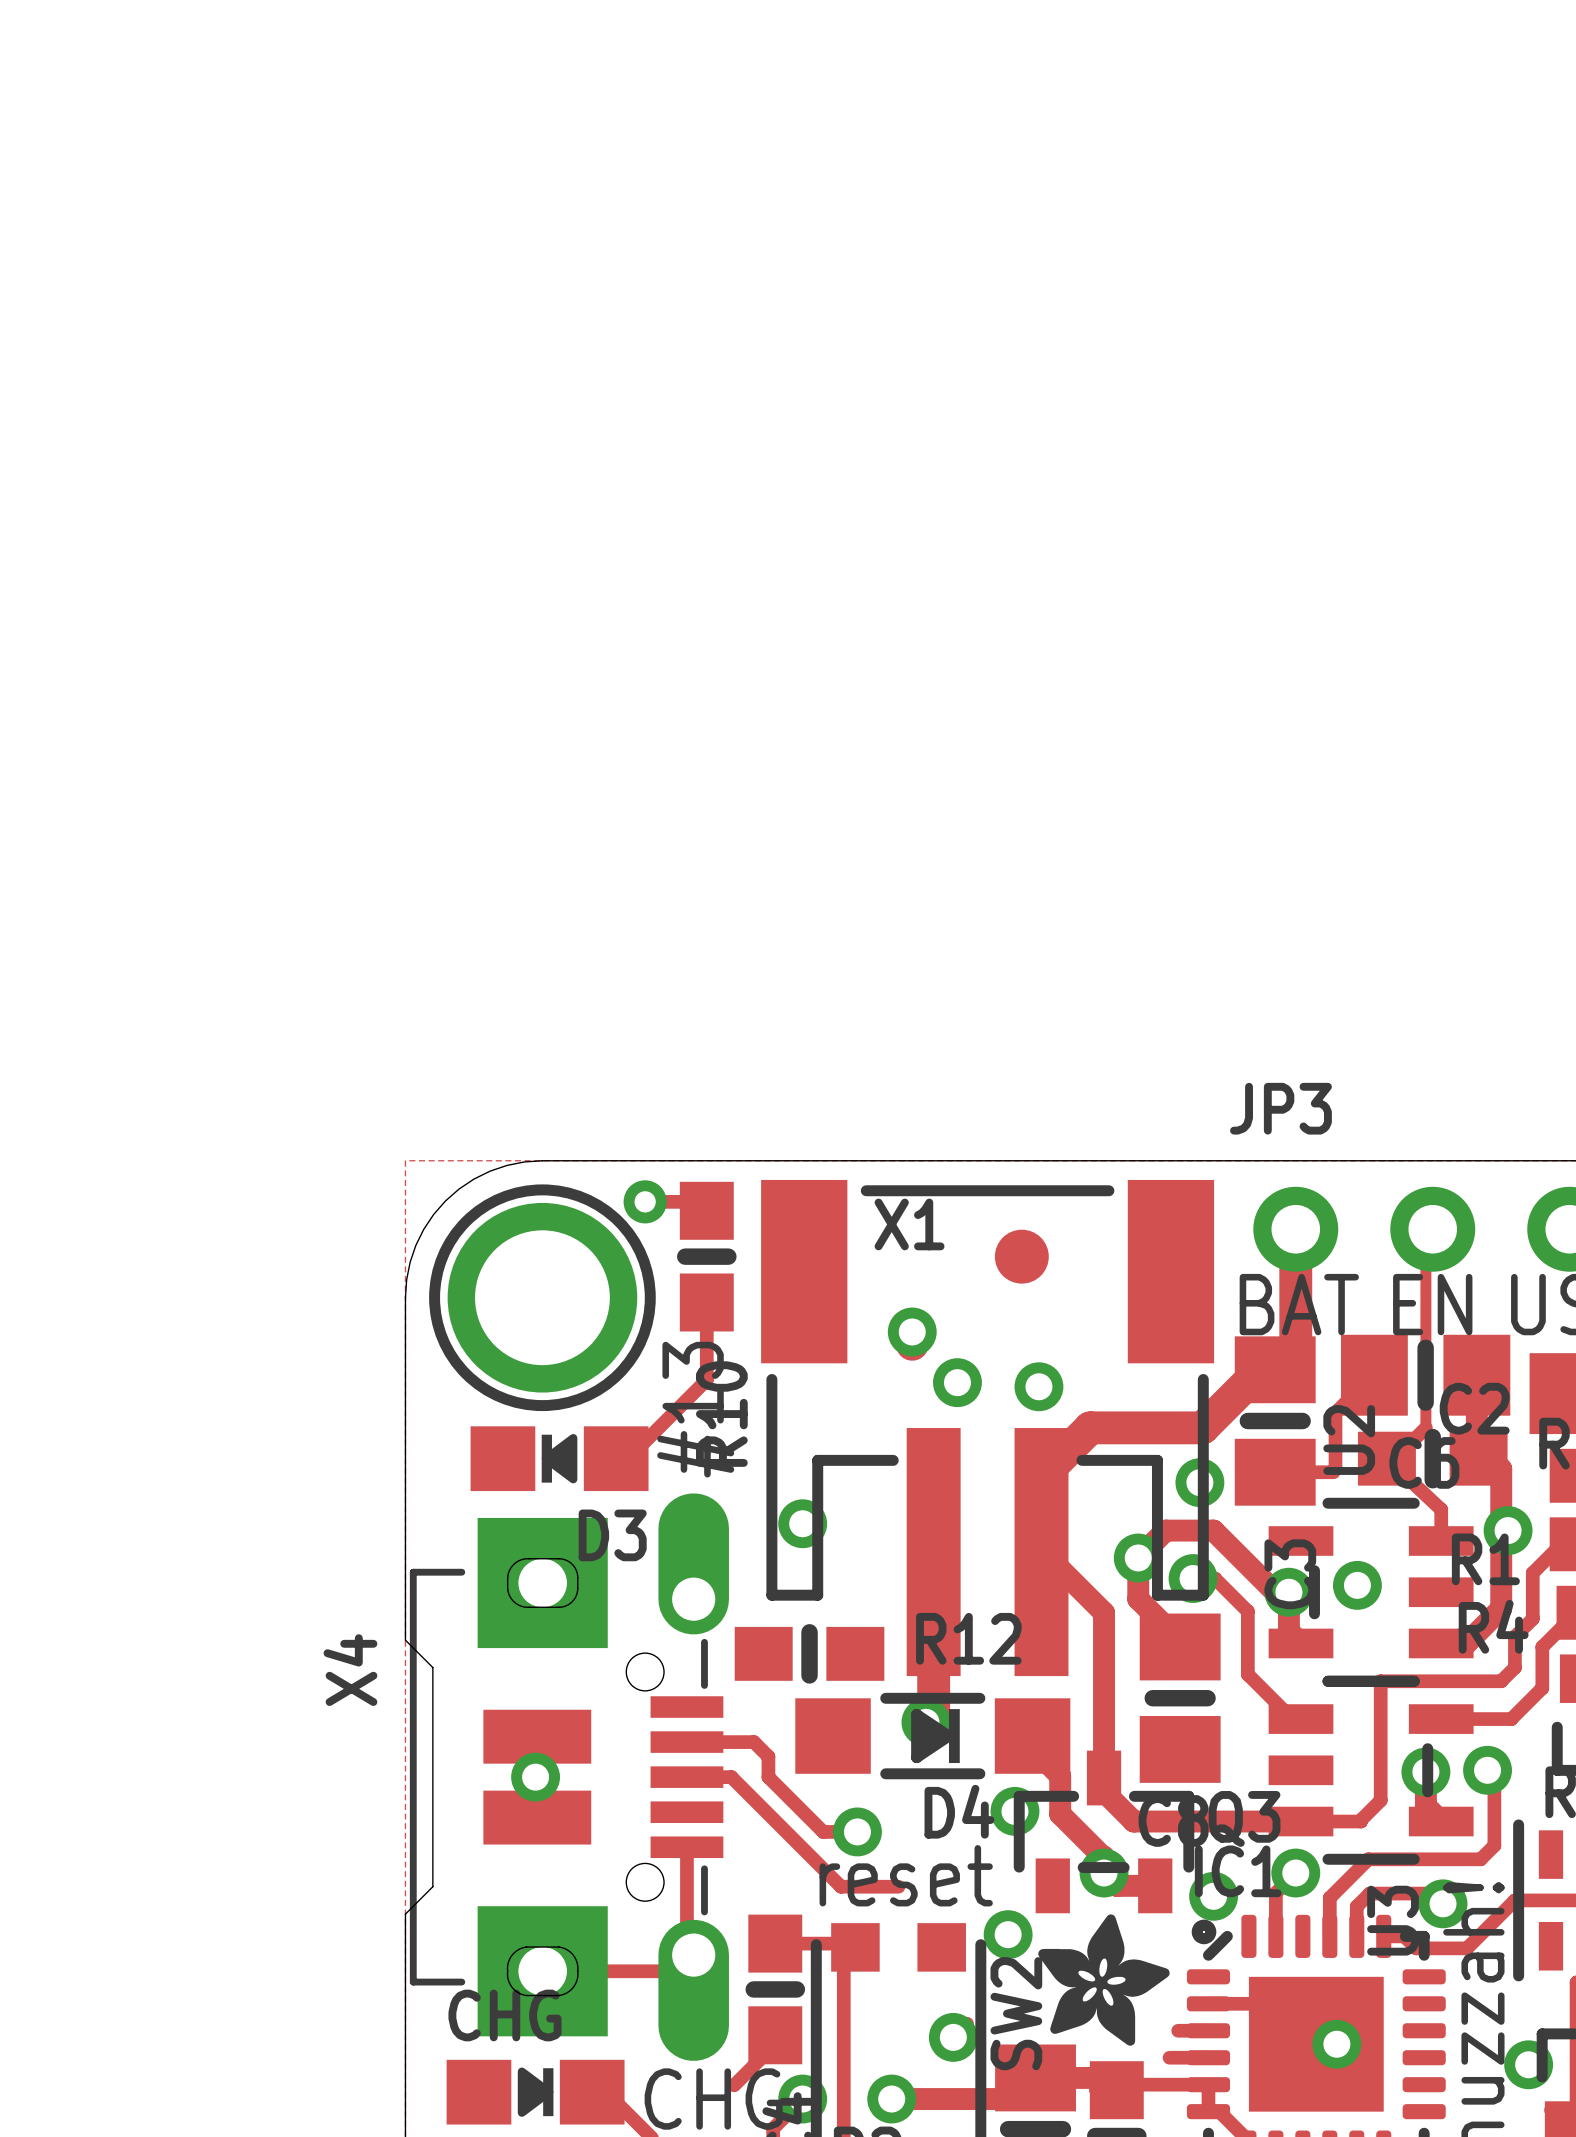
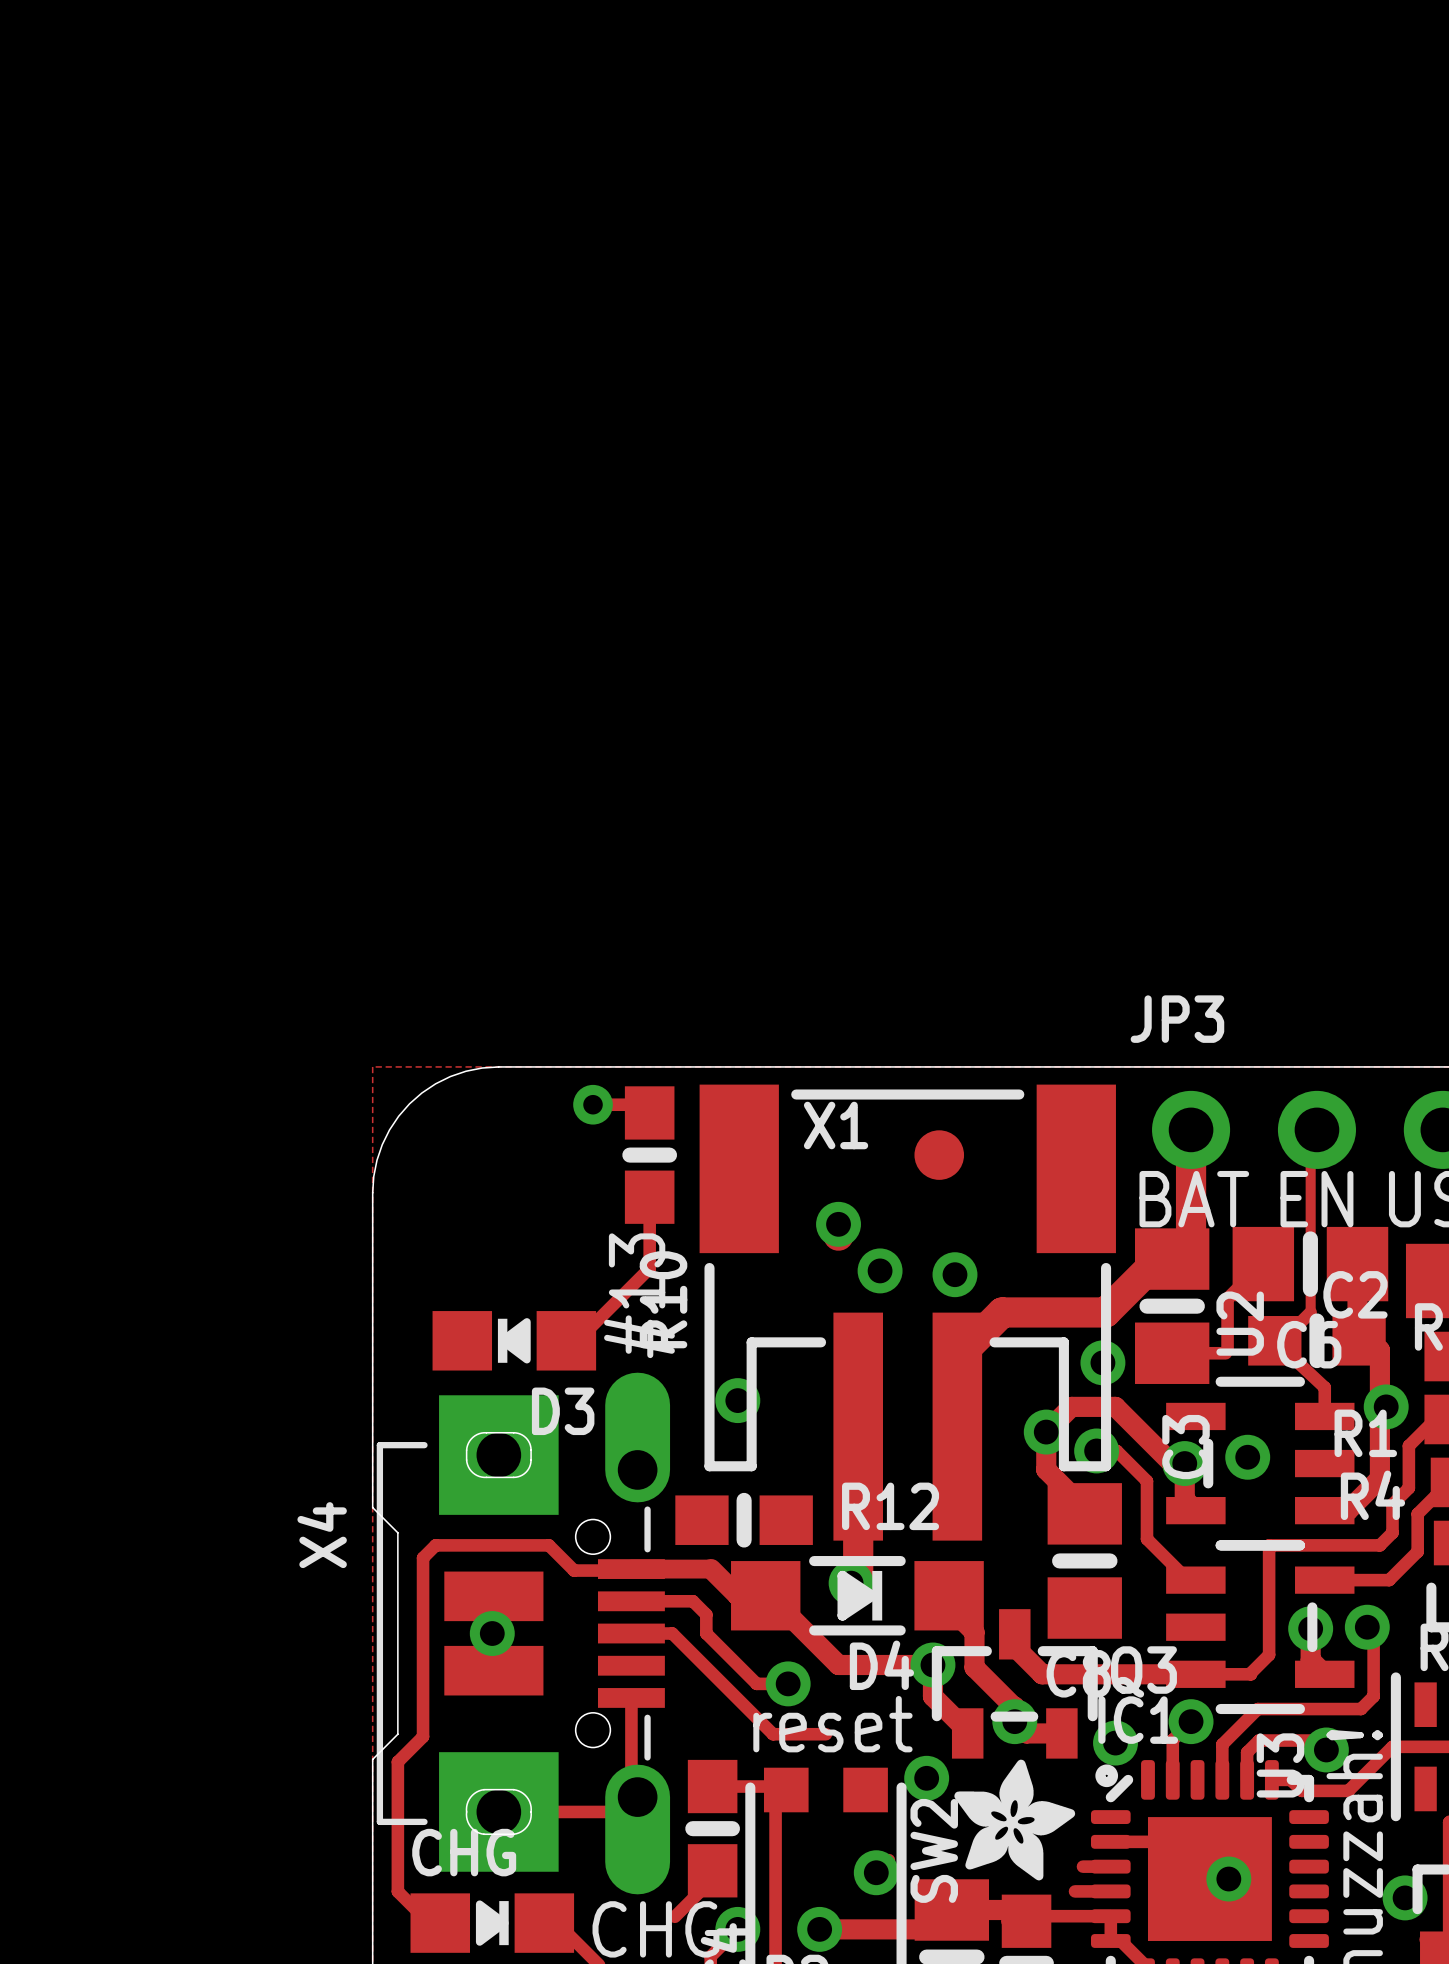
part: (542, 1297) -> none
track: (1049, 1558) (1104, 1612) (1104, 1778) -> none
track: none -> (631, 1569) (711, 1569) (737, 1595) (765, 1595)
track: none -> (629, 1570) (574, 1570) (548, 1545) (435, 1545) (423, 1557) (423, 1736) (397, 1761) (397, 1891) (429, 1923)
track: none -> (769, 1595) (838, 1664) (932, 1664) (932, 1696) (967, 1731)

